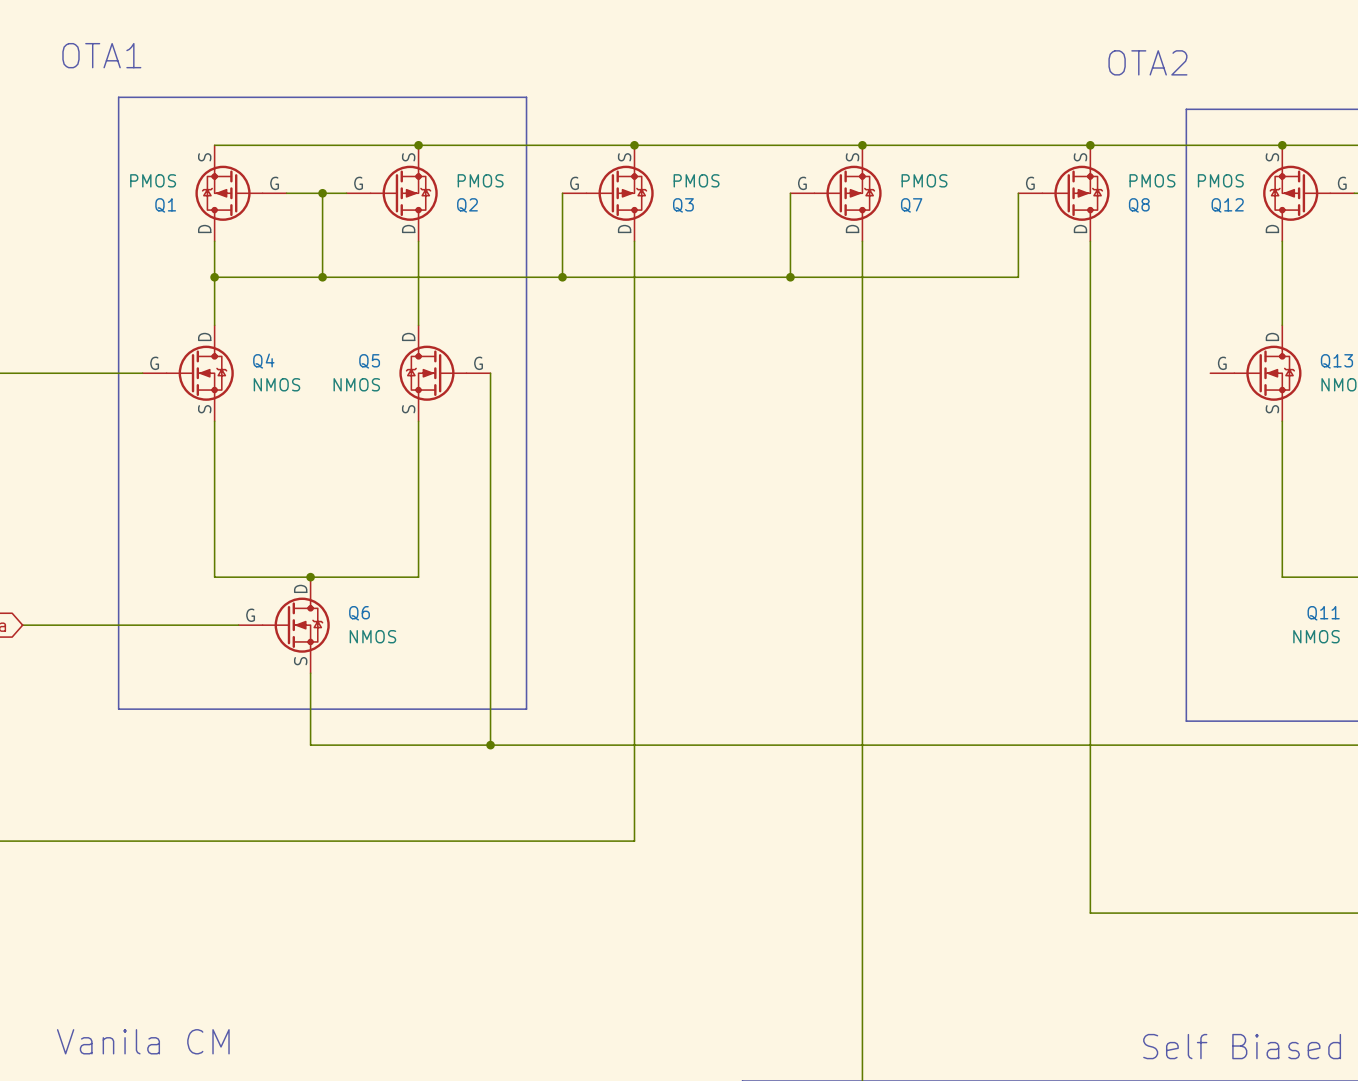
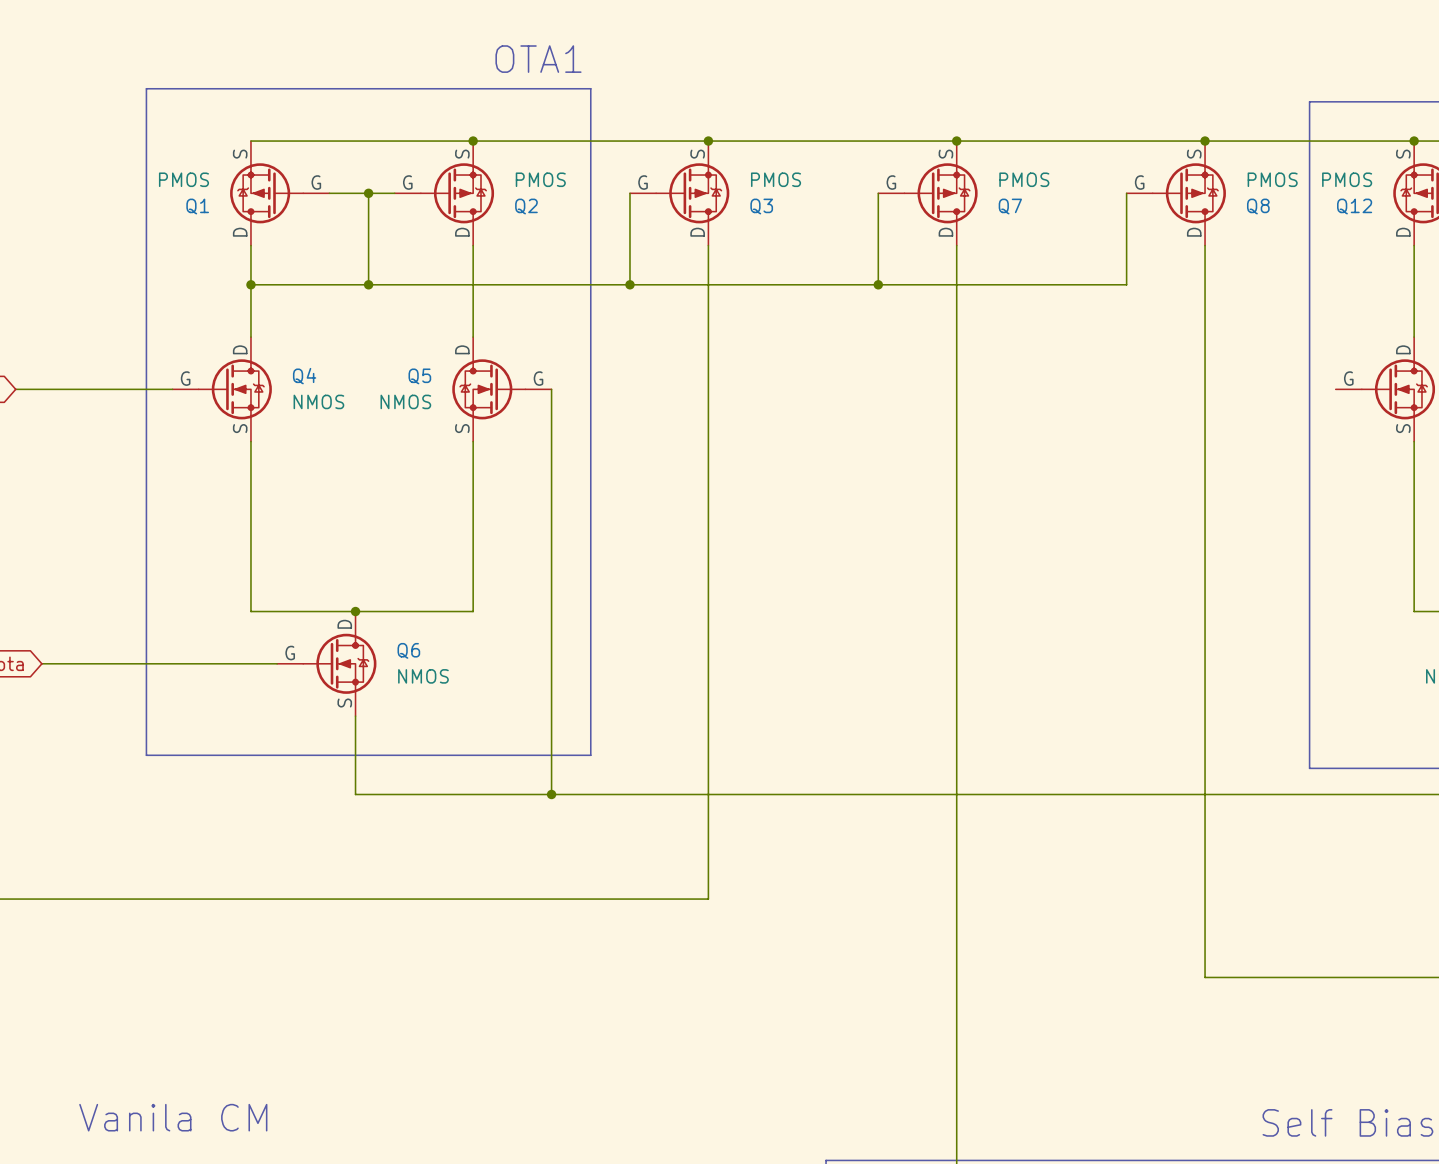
text: OTA1 (101, 55) -> none
text: OTA2 (1147, 62) -> none
text: none -> OTA1 (538, 59)

